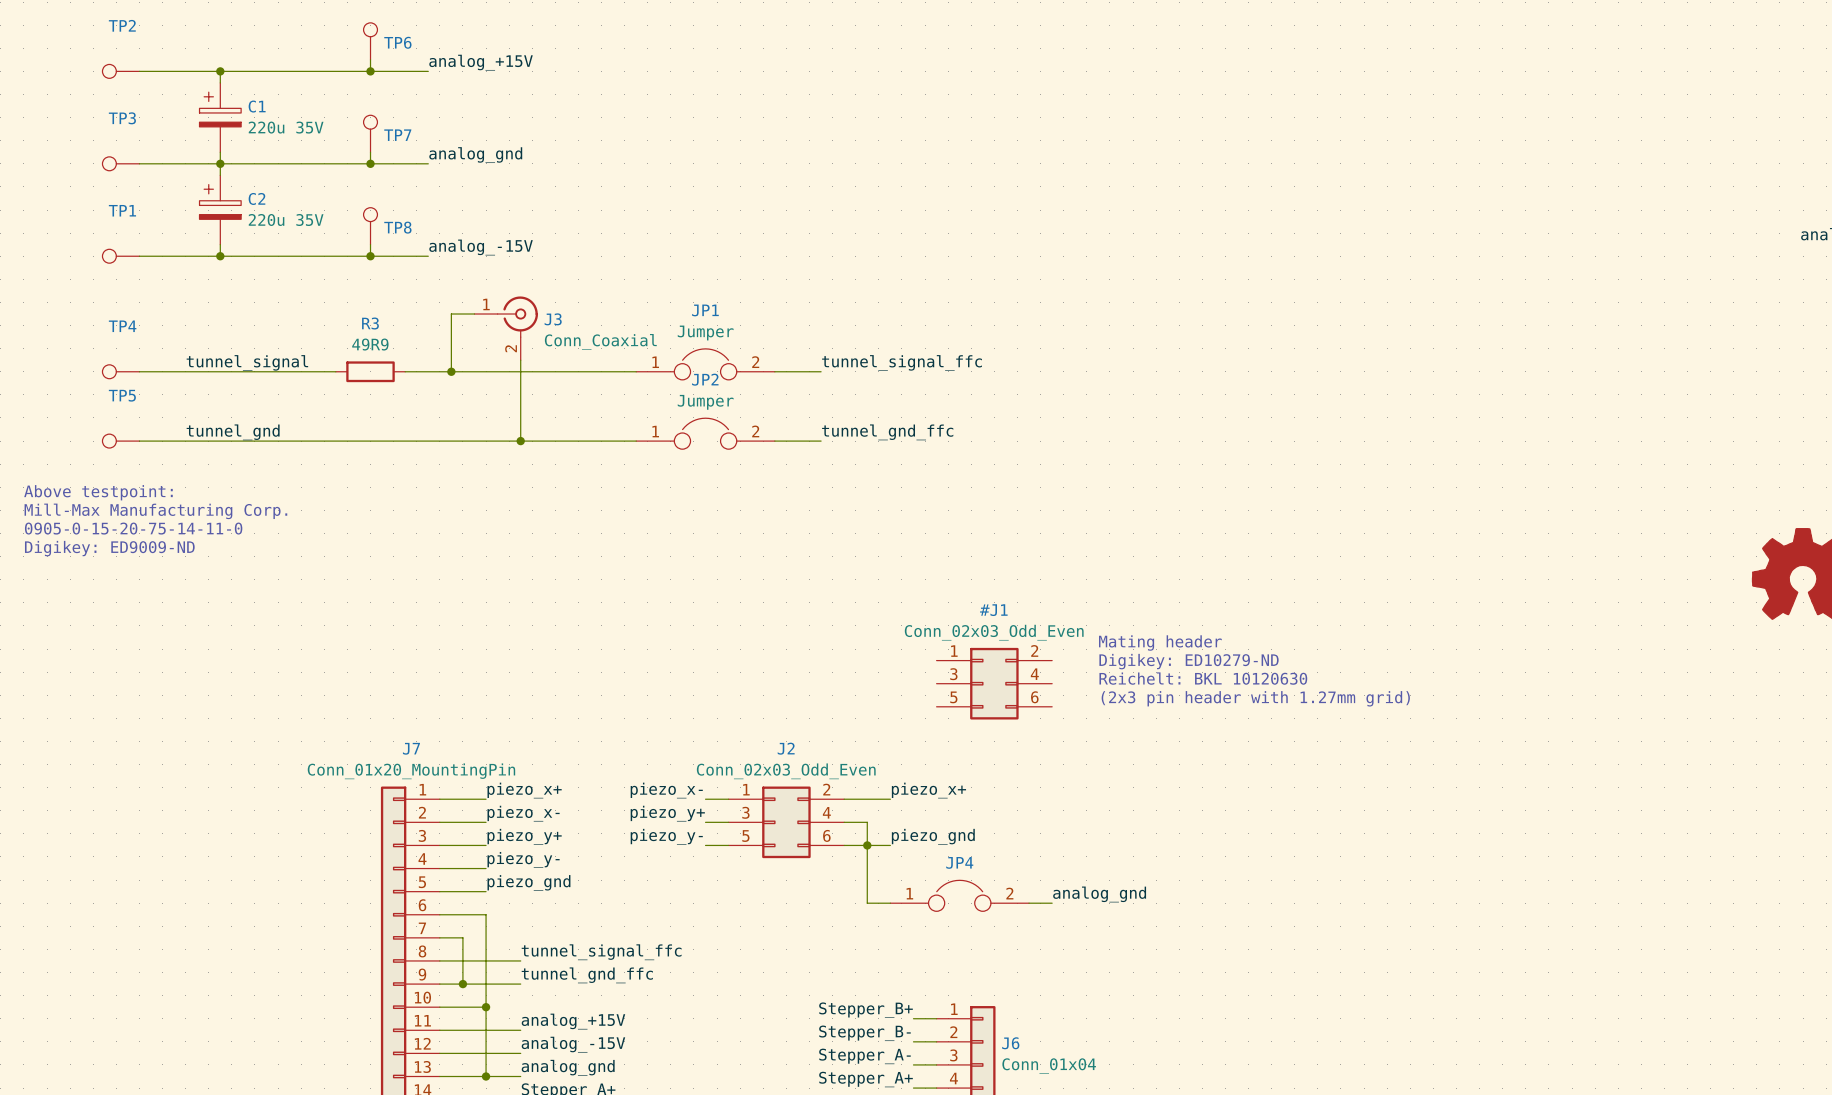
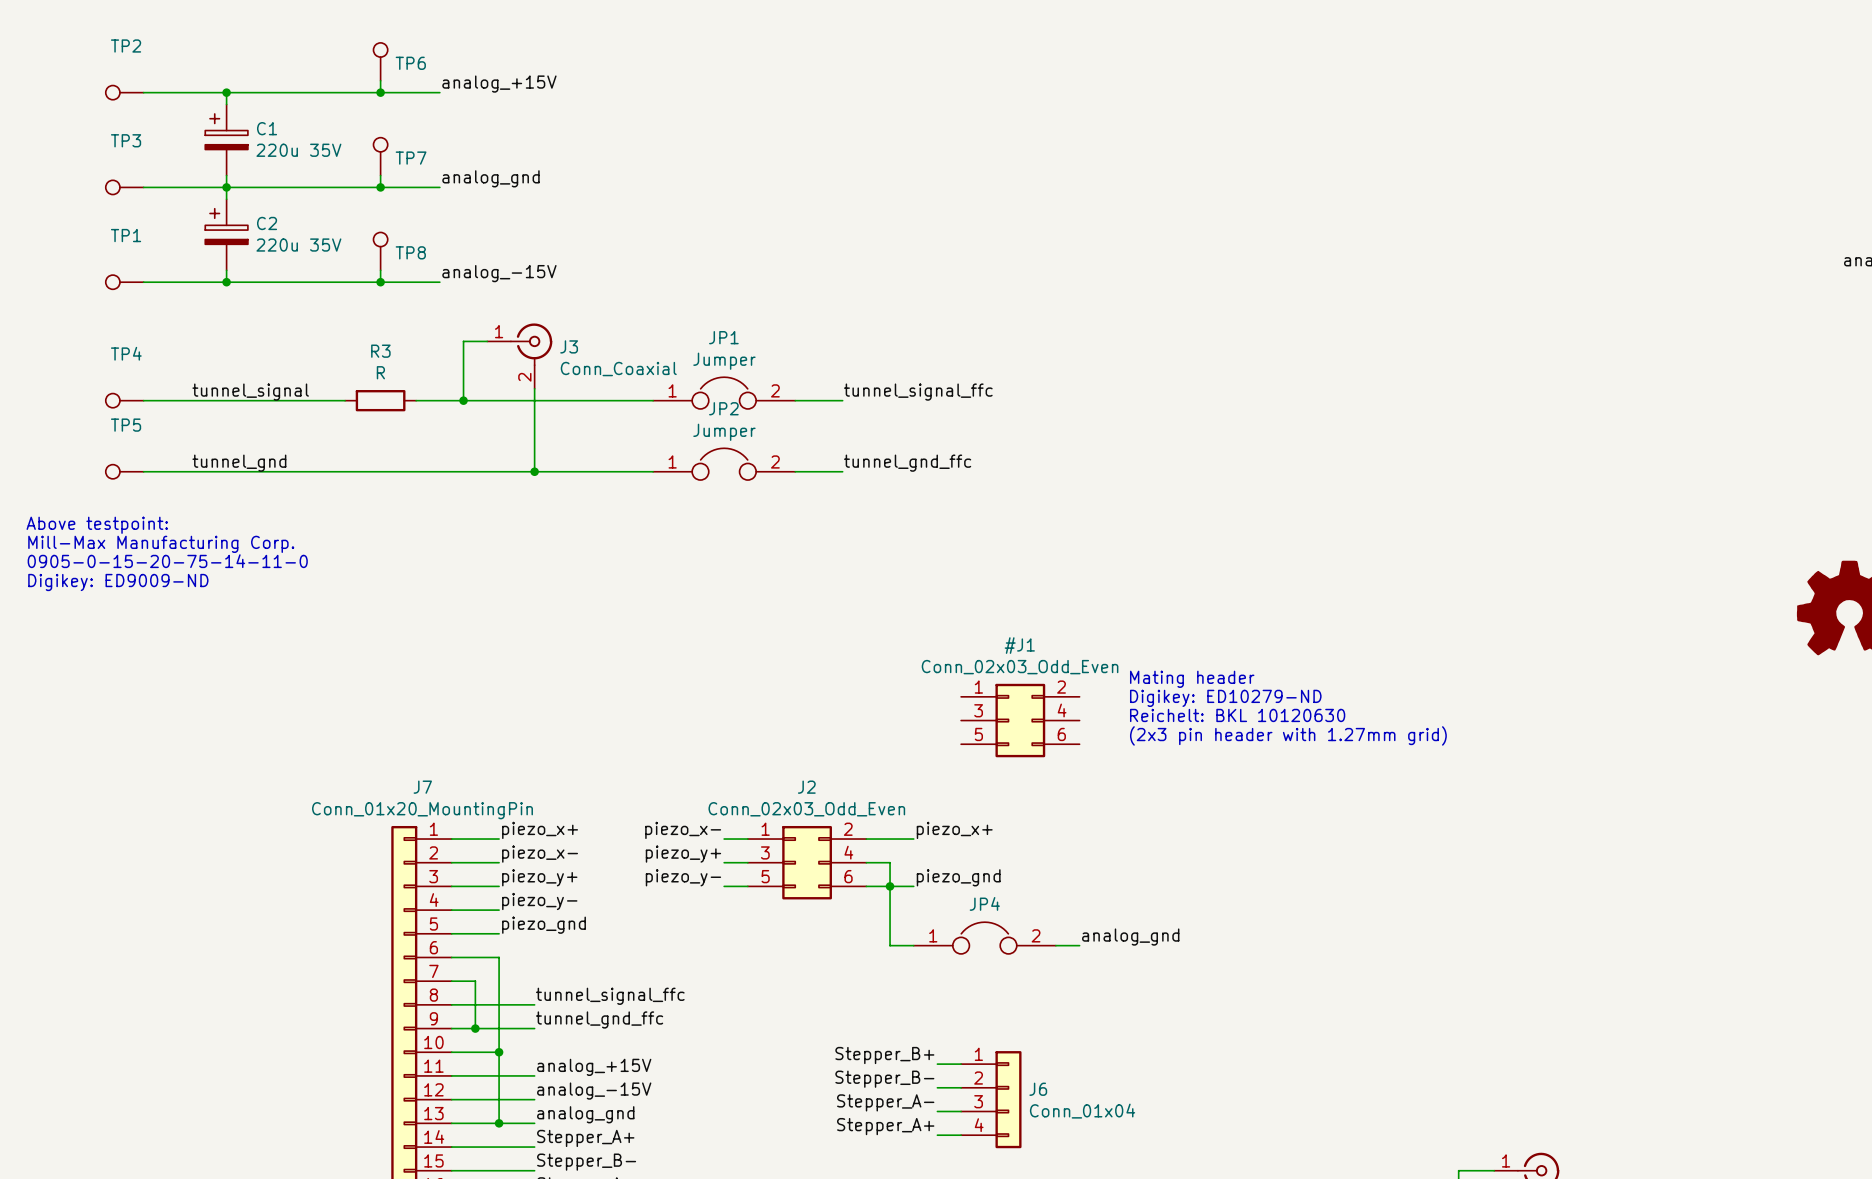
R3 value: 49R9 (370, 344) -> R (380, 372)

